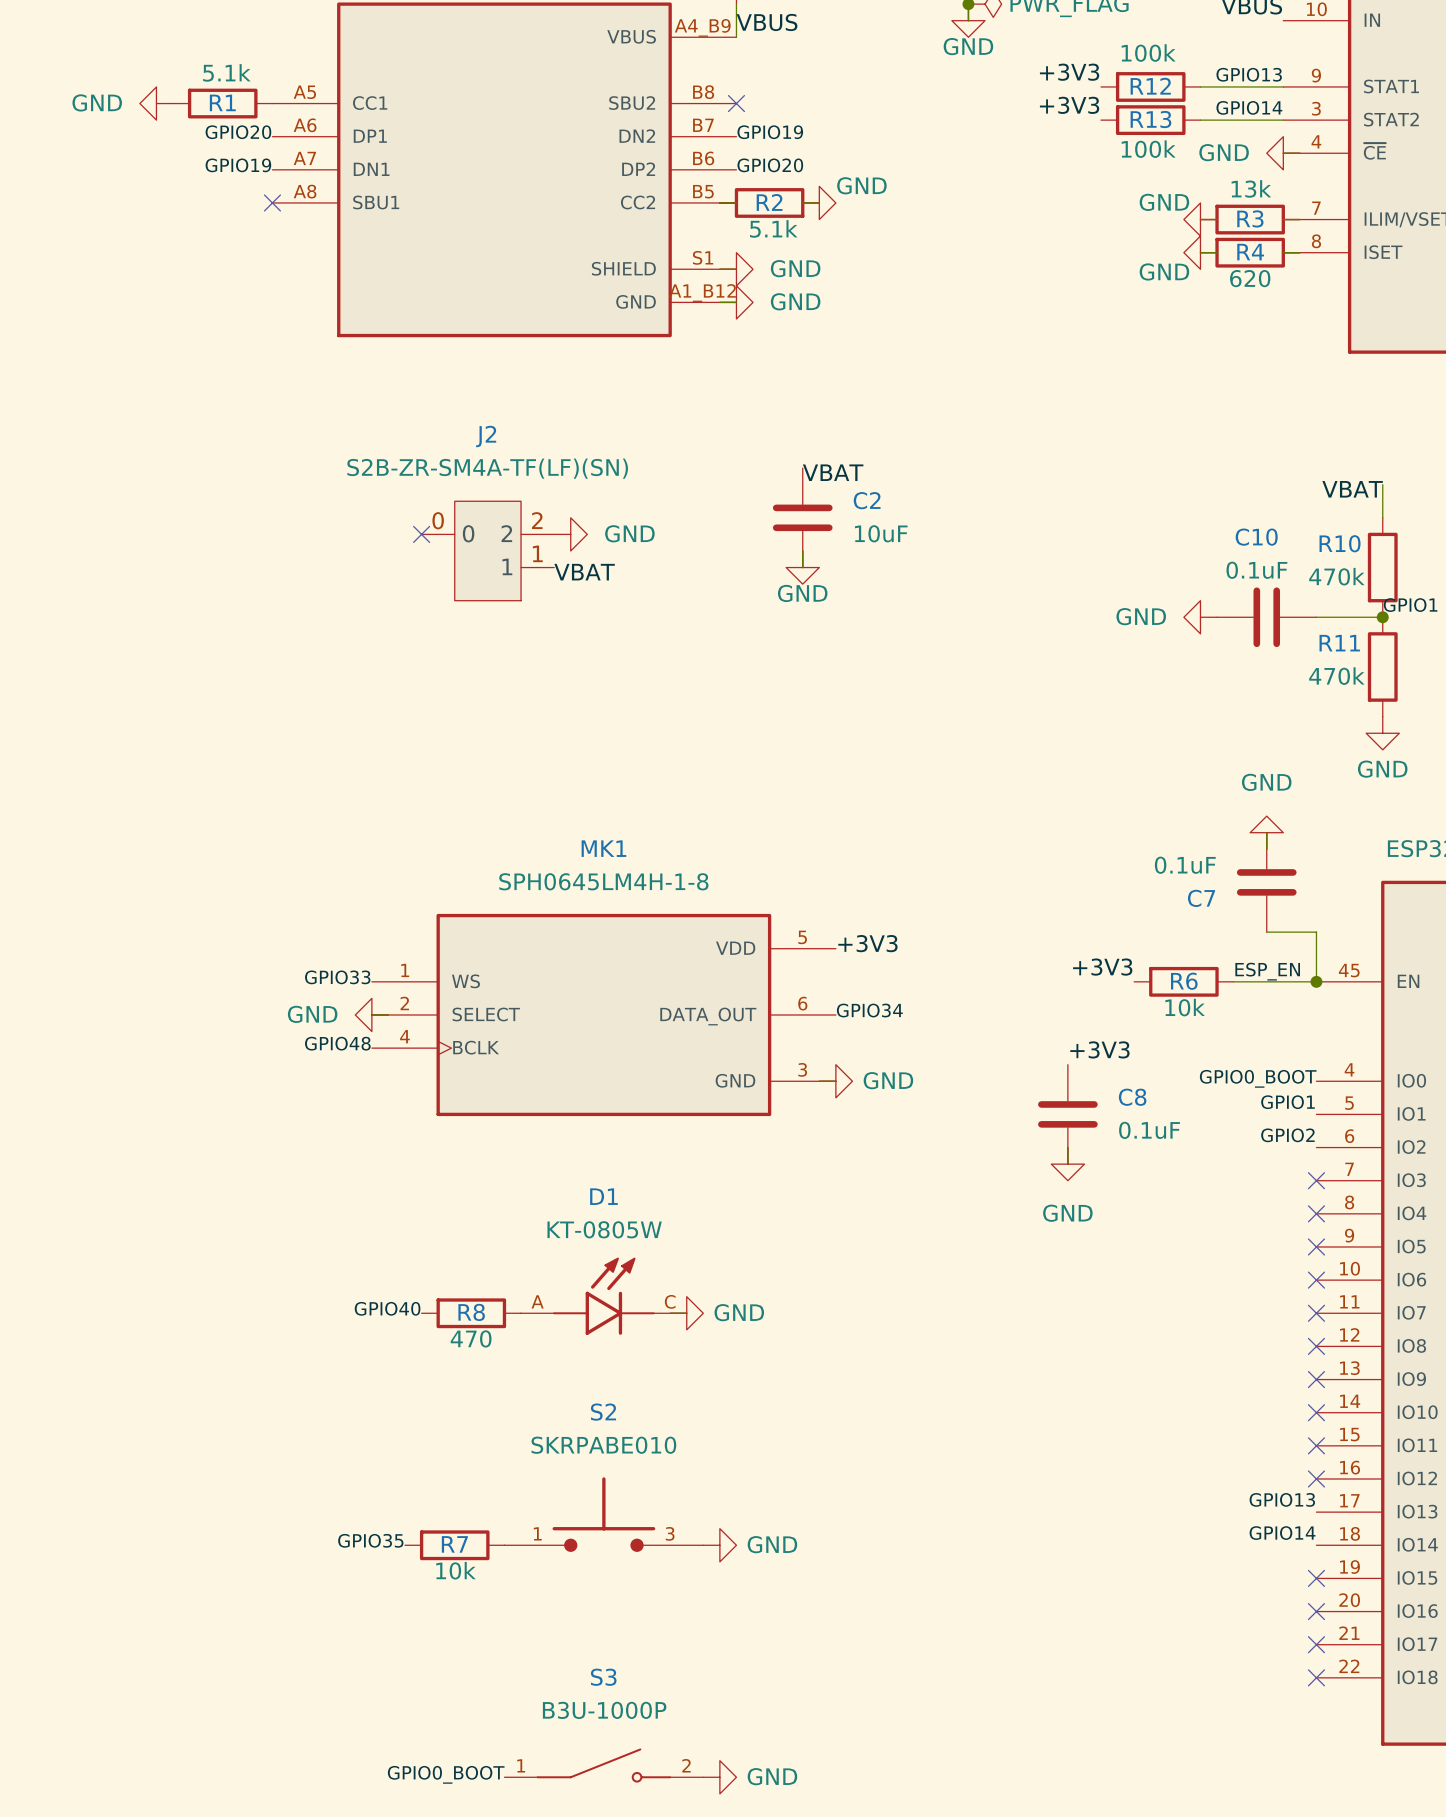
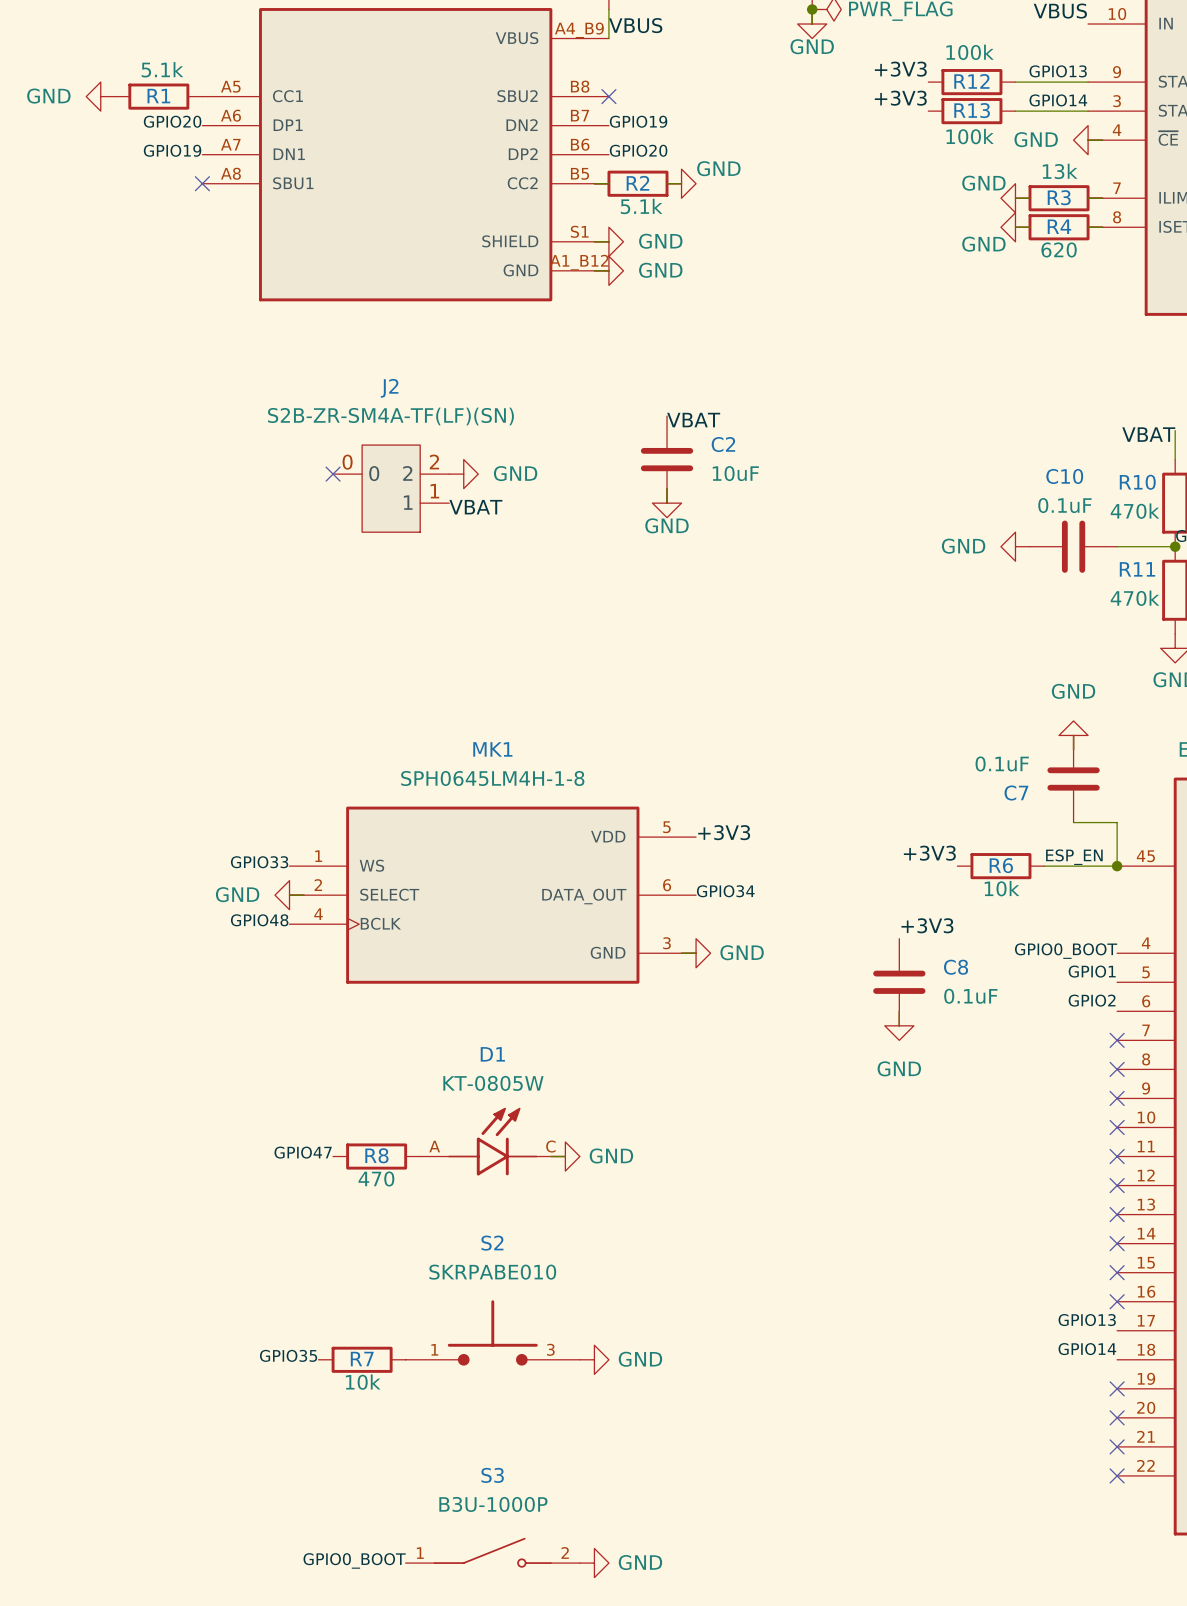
label: GPIO40 (387, 1308) -> GPIO47 (303, 1152)

